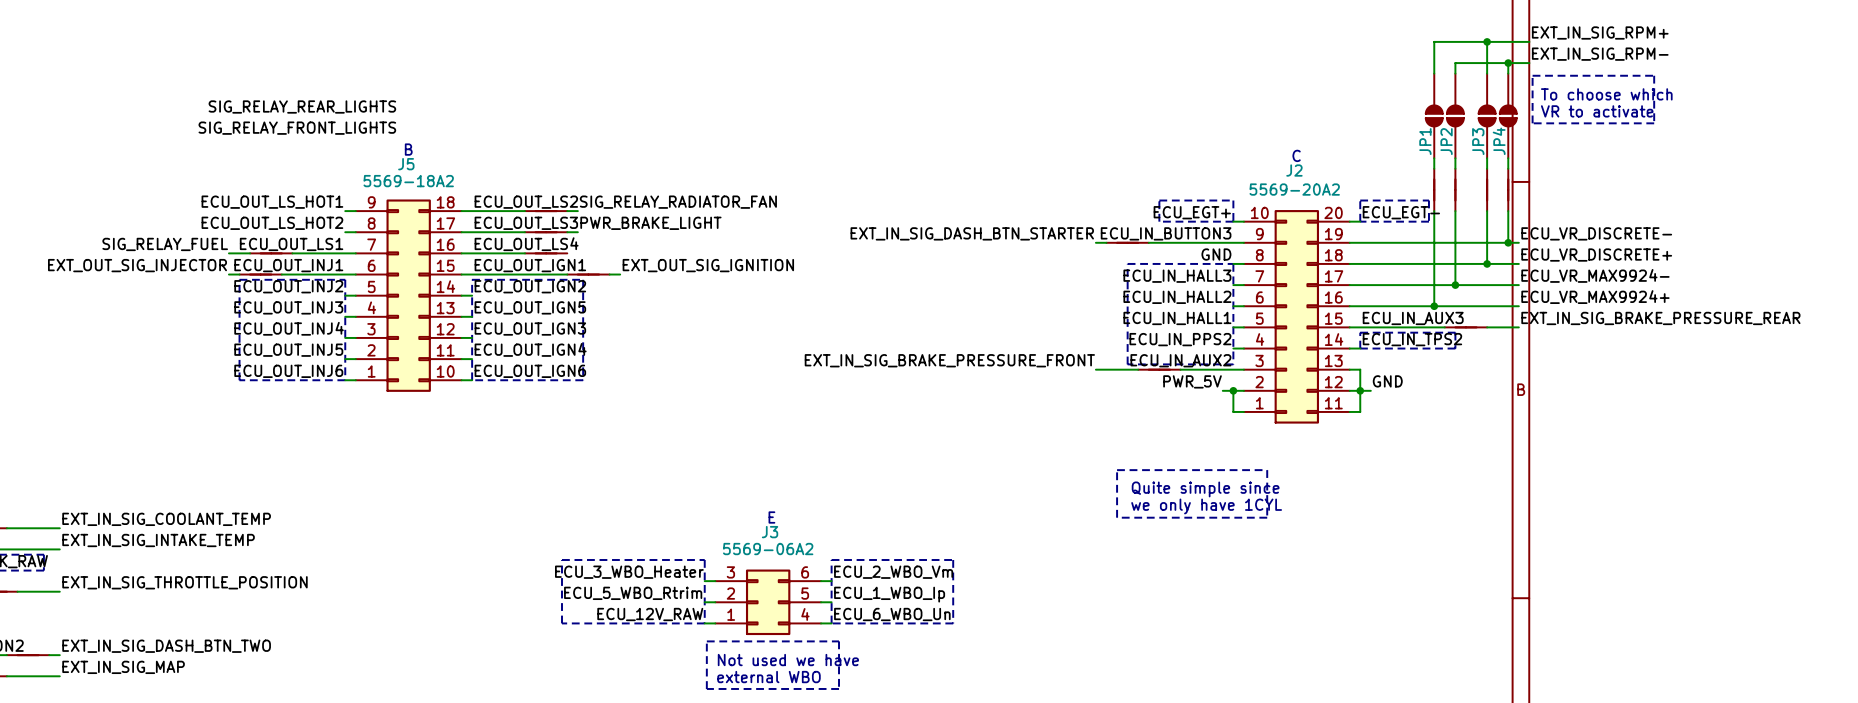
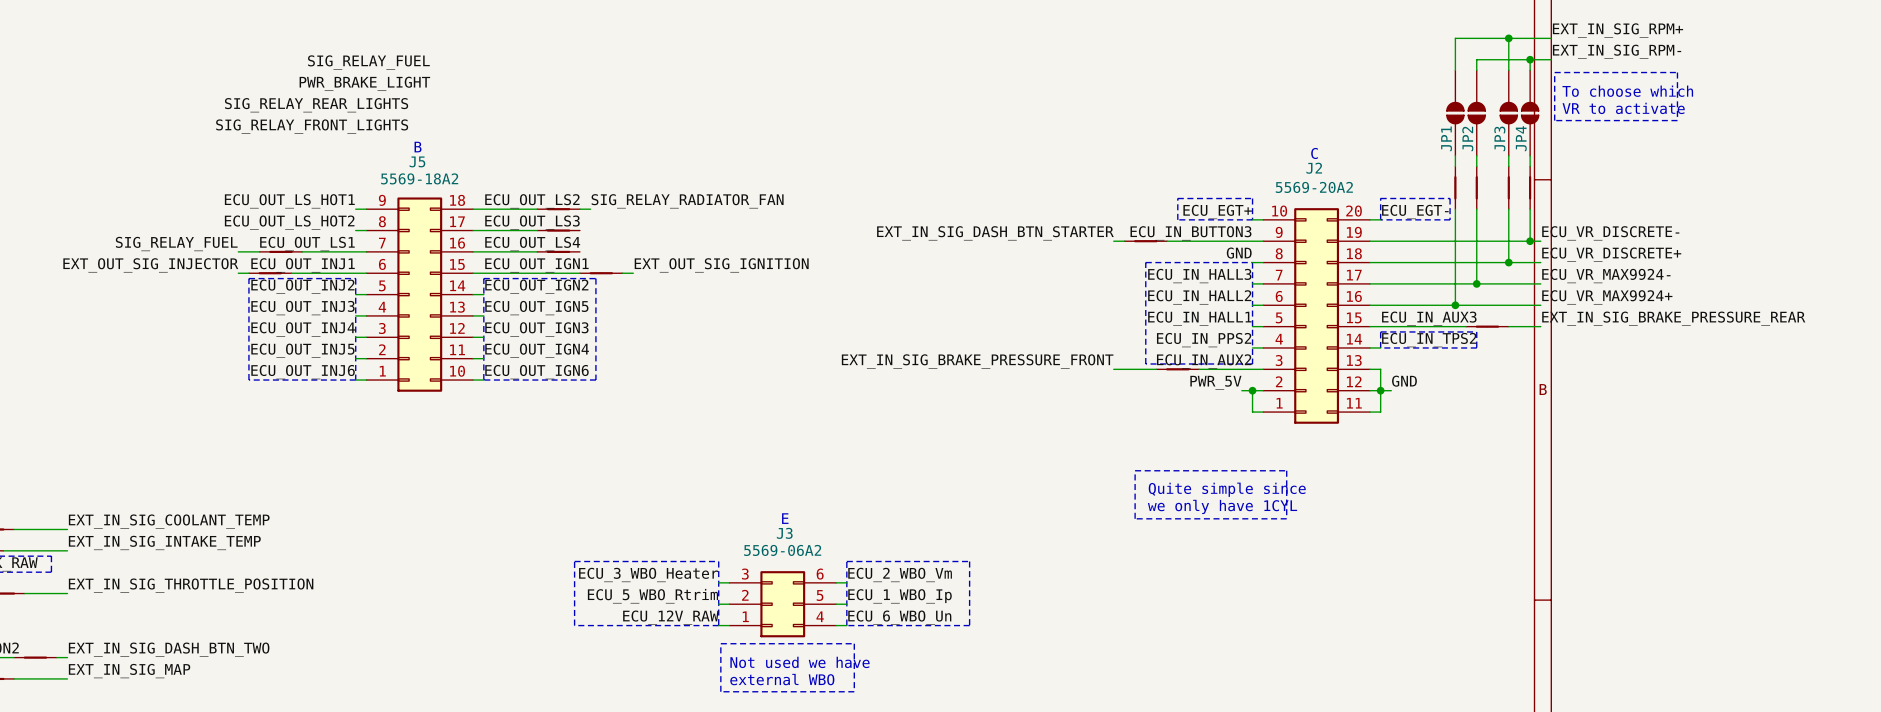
label: none -> SIG_RELAY_FUEL (368, 62)
label: none -> PWR_BRAKE_LIGHT (364, 83)
label: PWR_BRAKE_LIGHT (650, 223) -> none
wire: (567, 232) (577, 232) -> none

